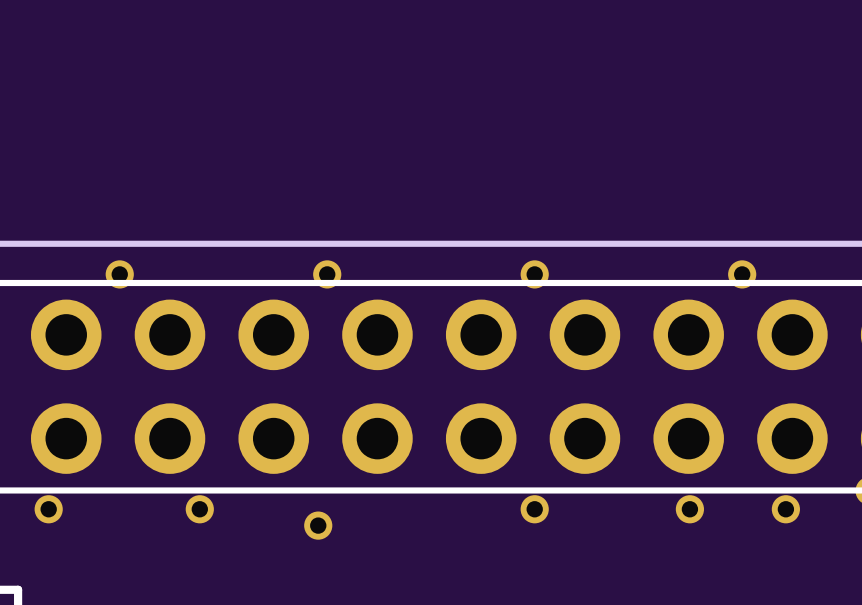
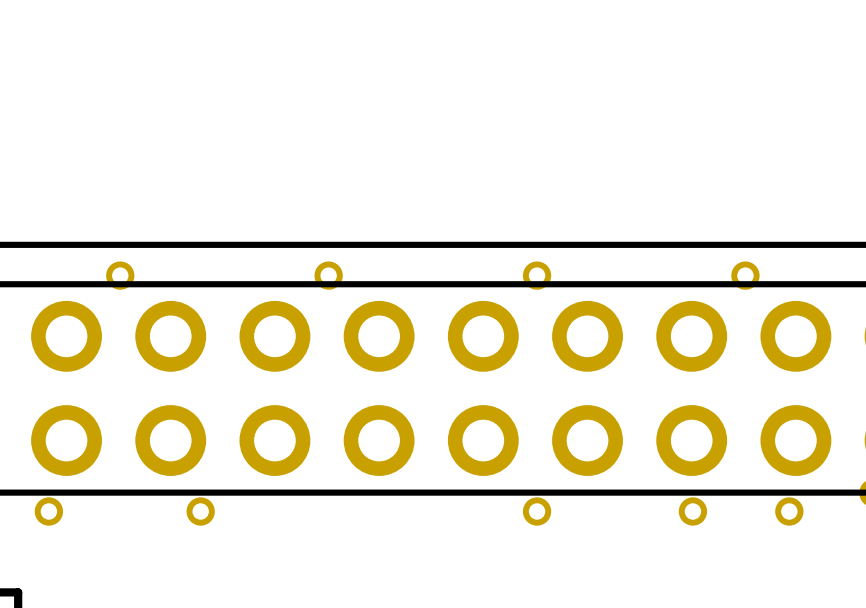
part: (318, 525) -> none

